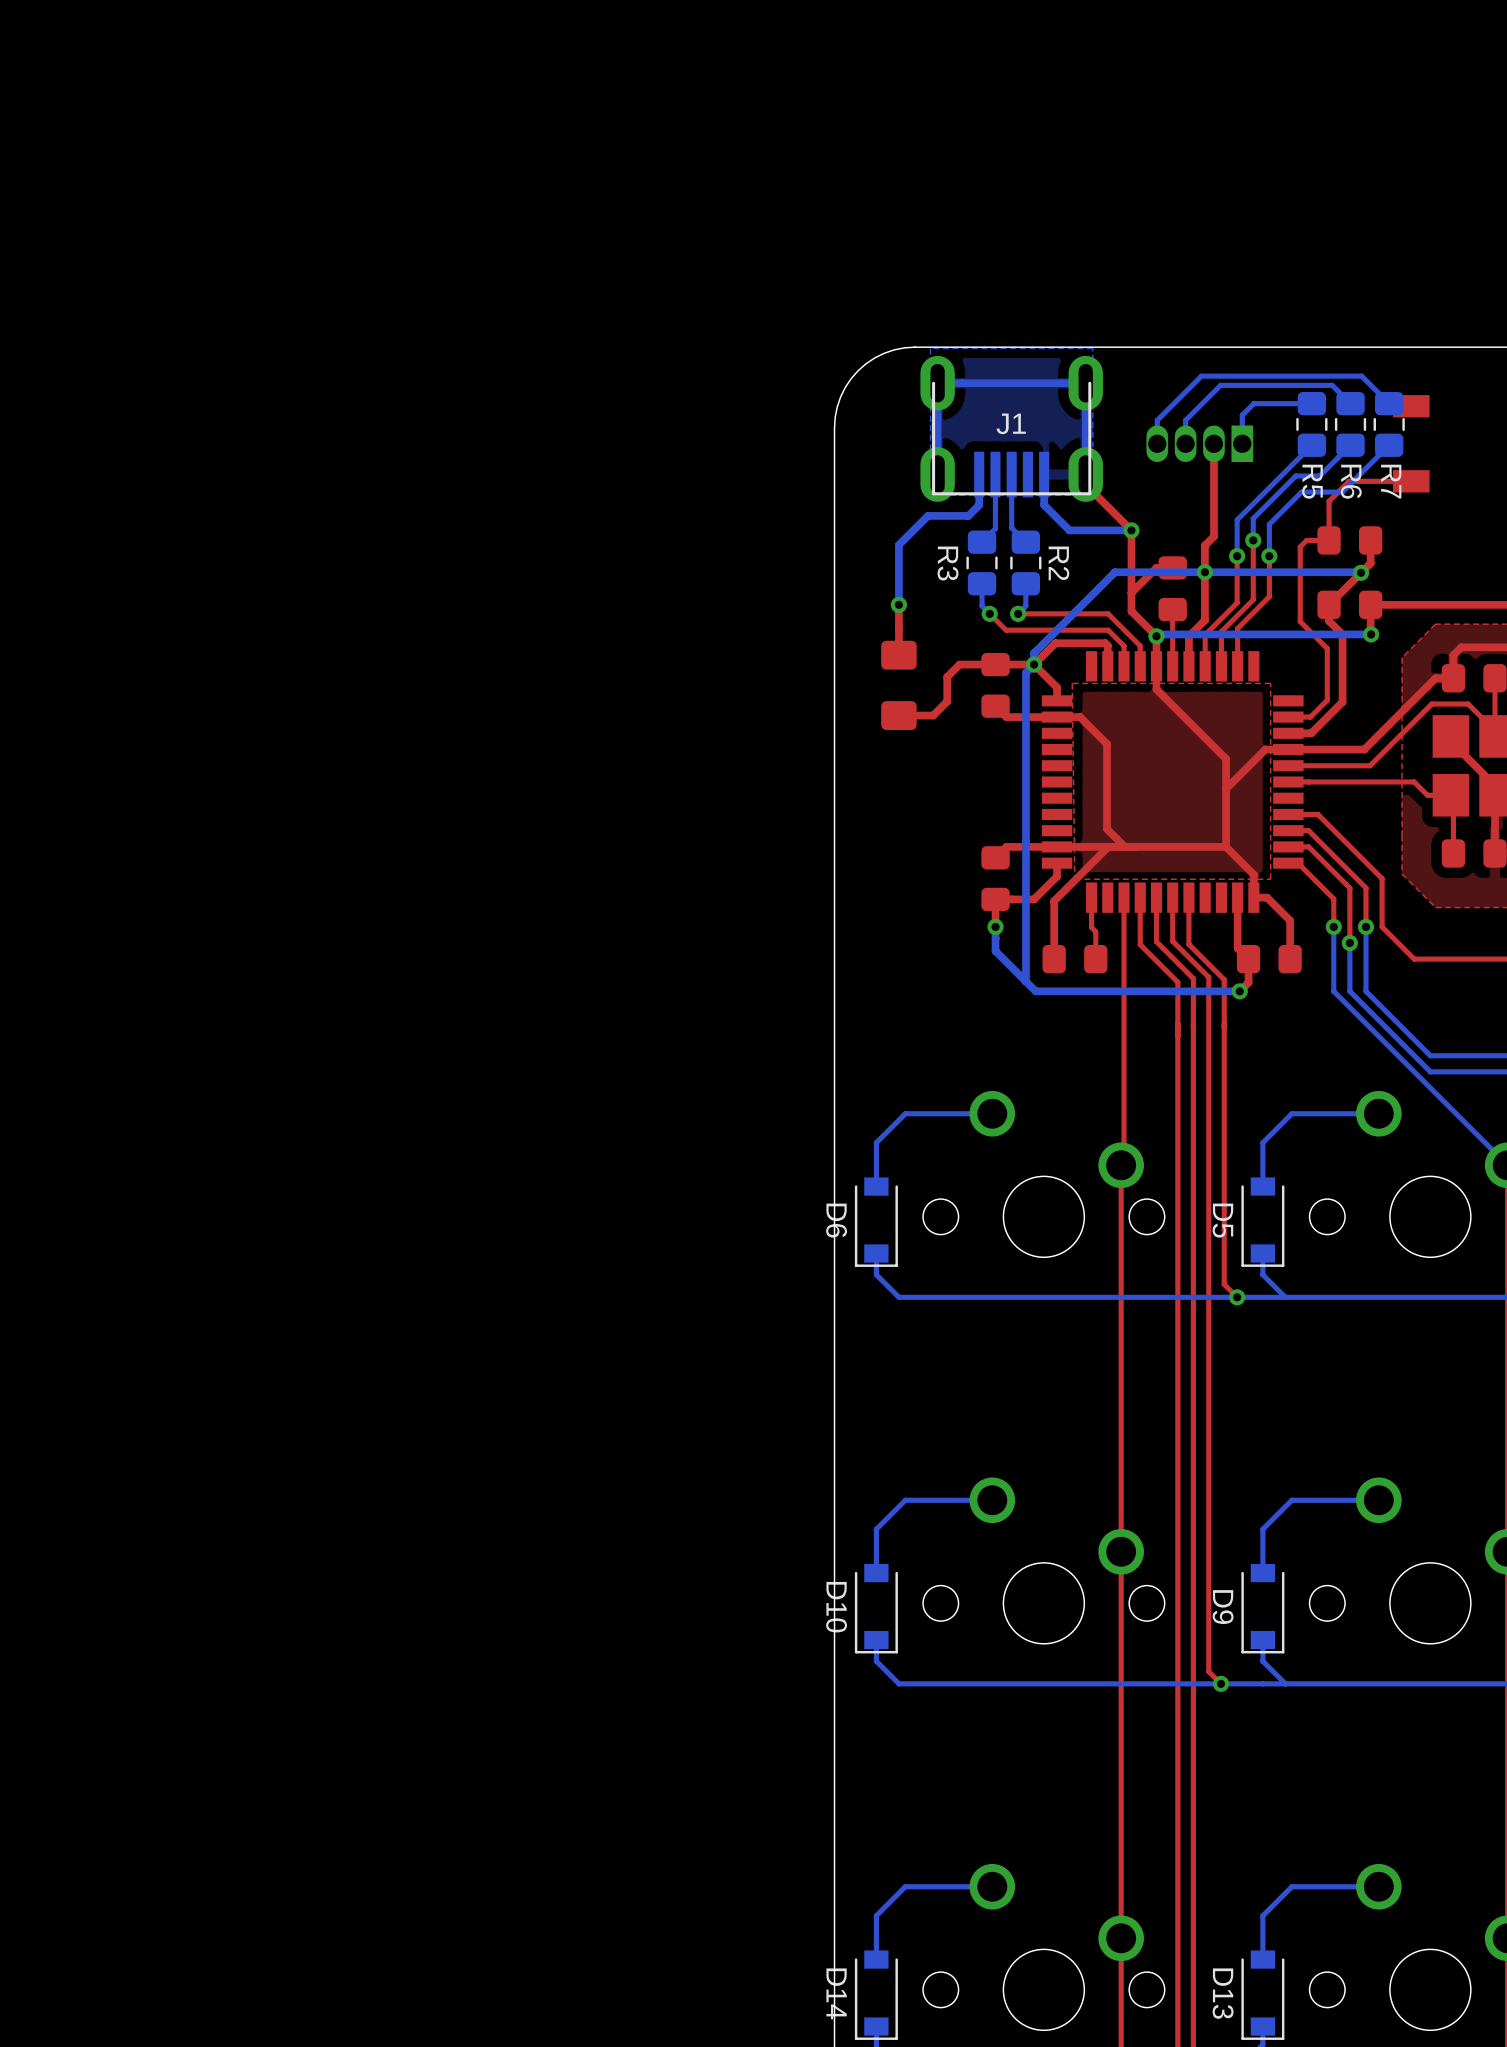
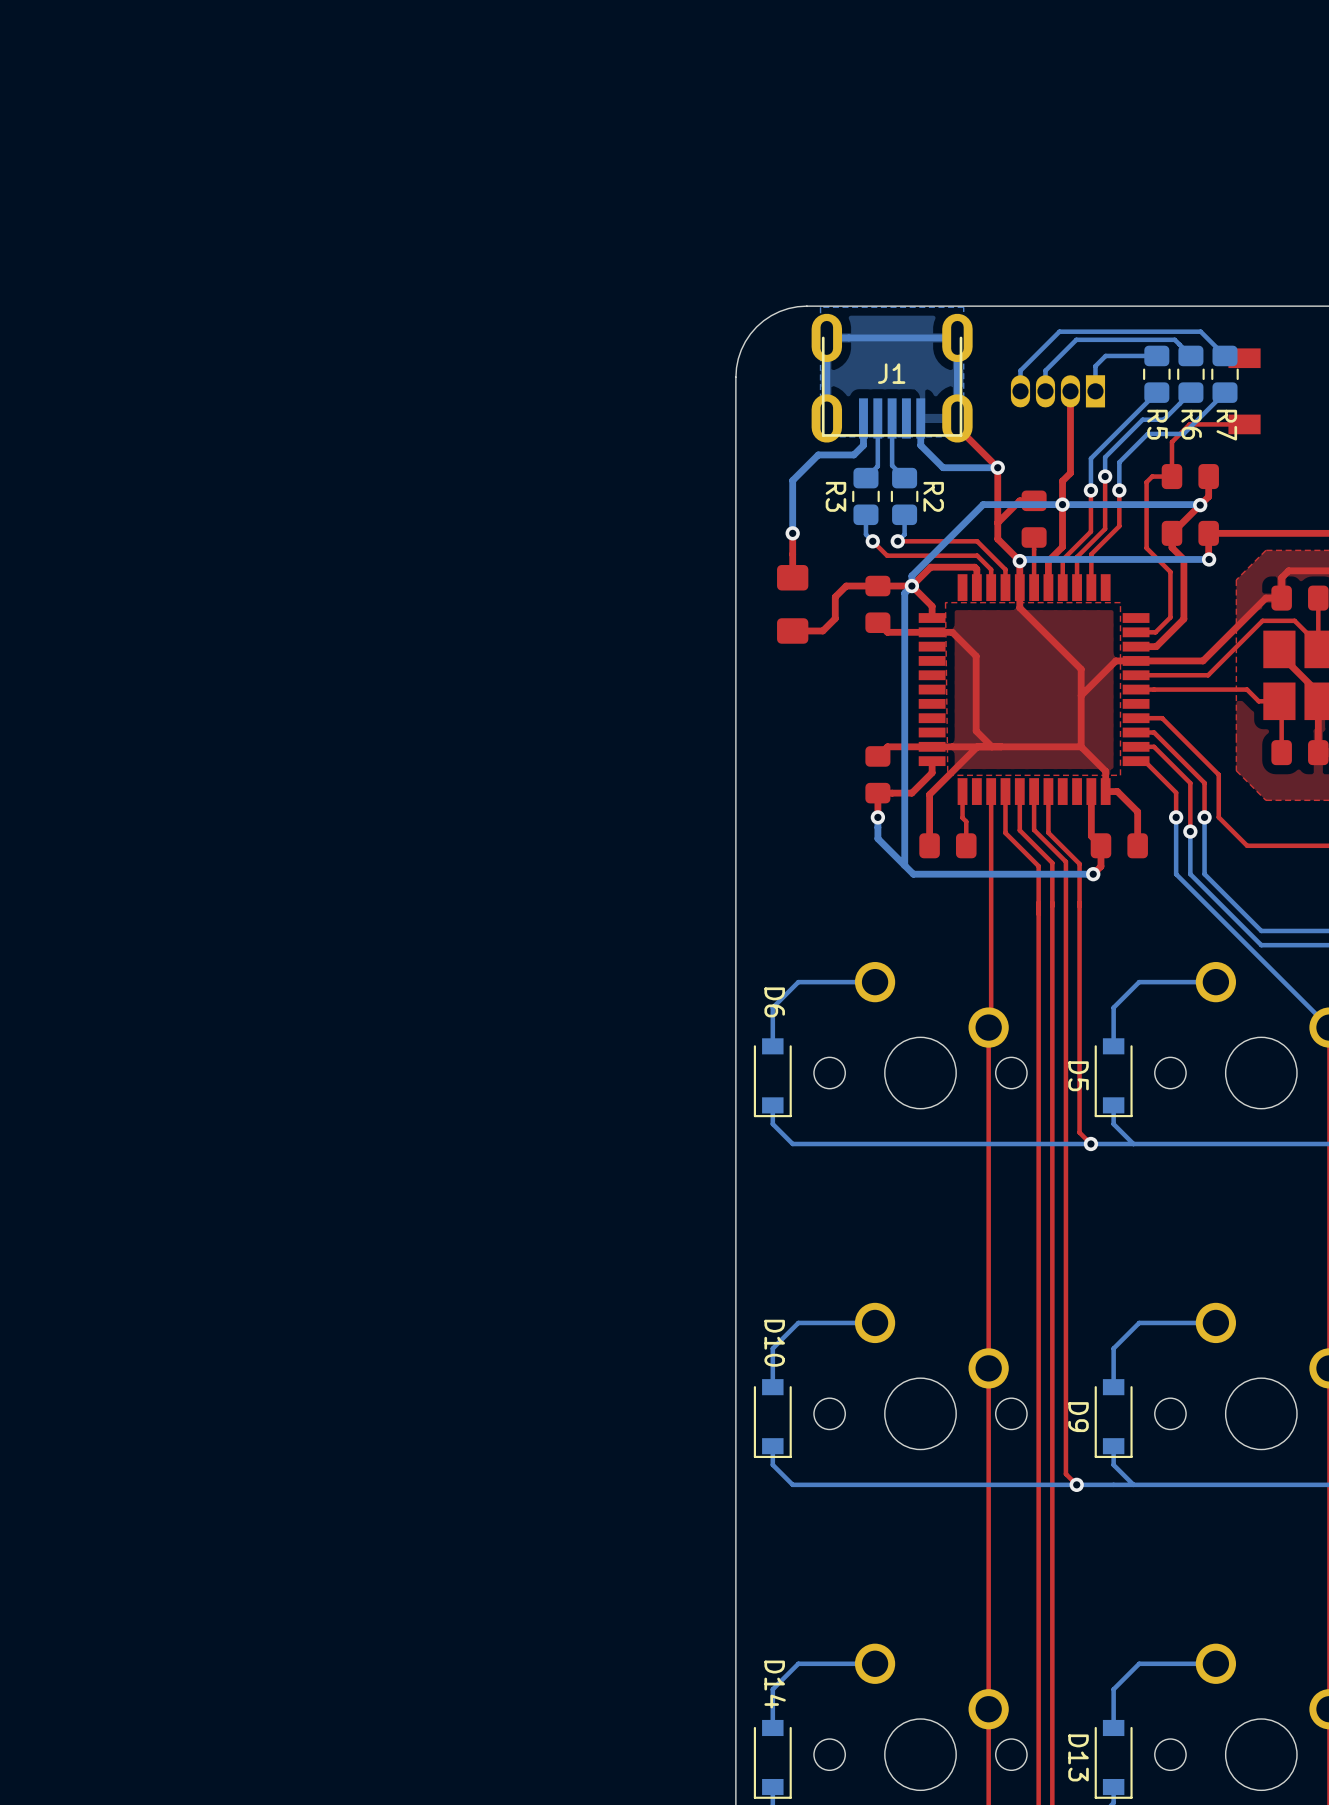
D6 name position: D6 (836, 1220) -> D6 (774, 1002)
D10 name position: D10 (836, 1607) -> D10 (774, 1343)
D14 name position: D14 (836, 1993) -> D14 (775, 1684)

